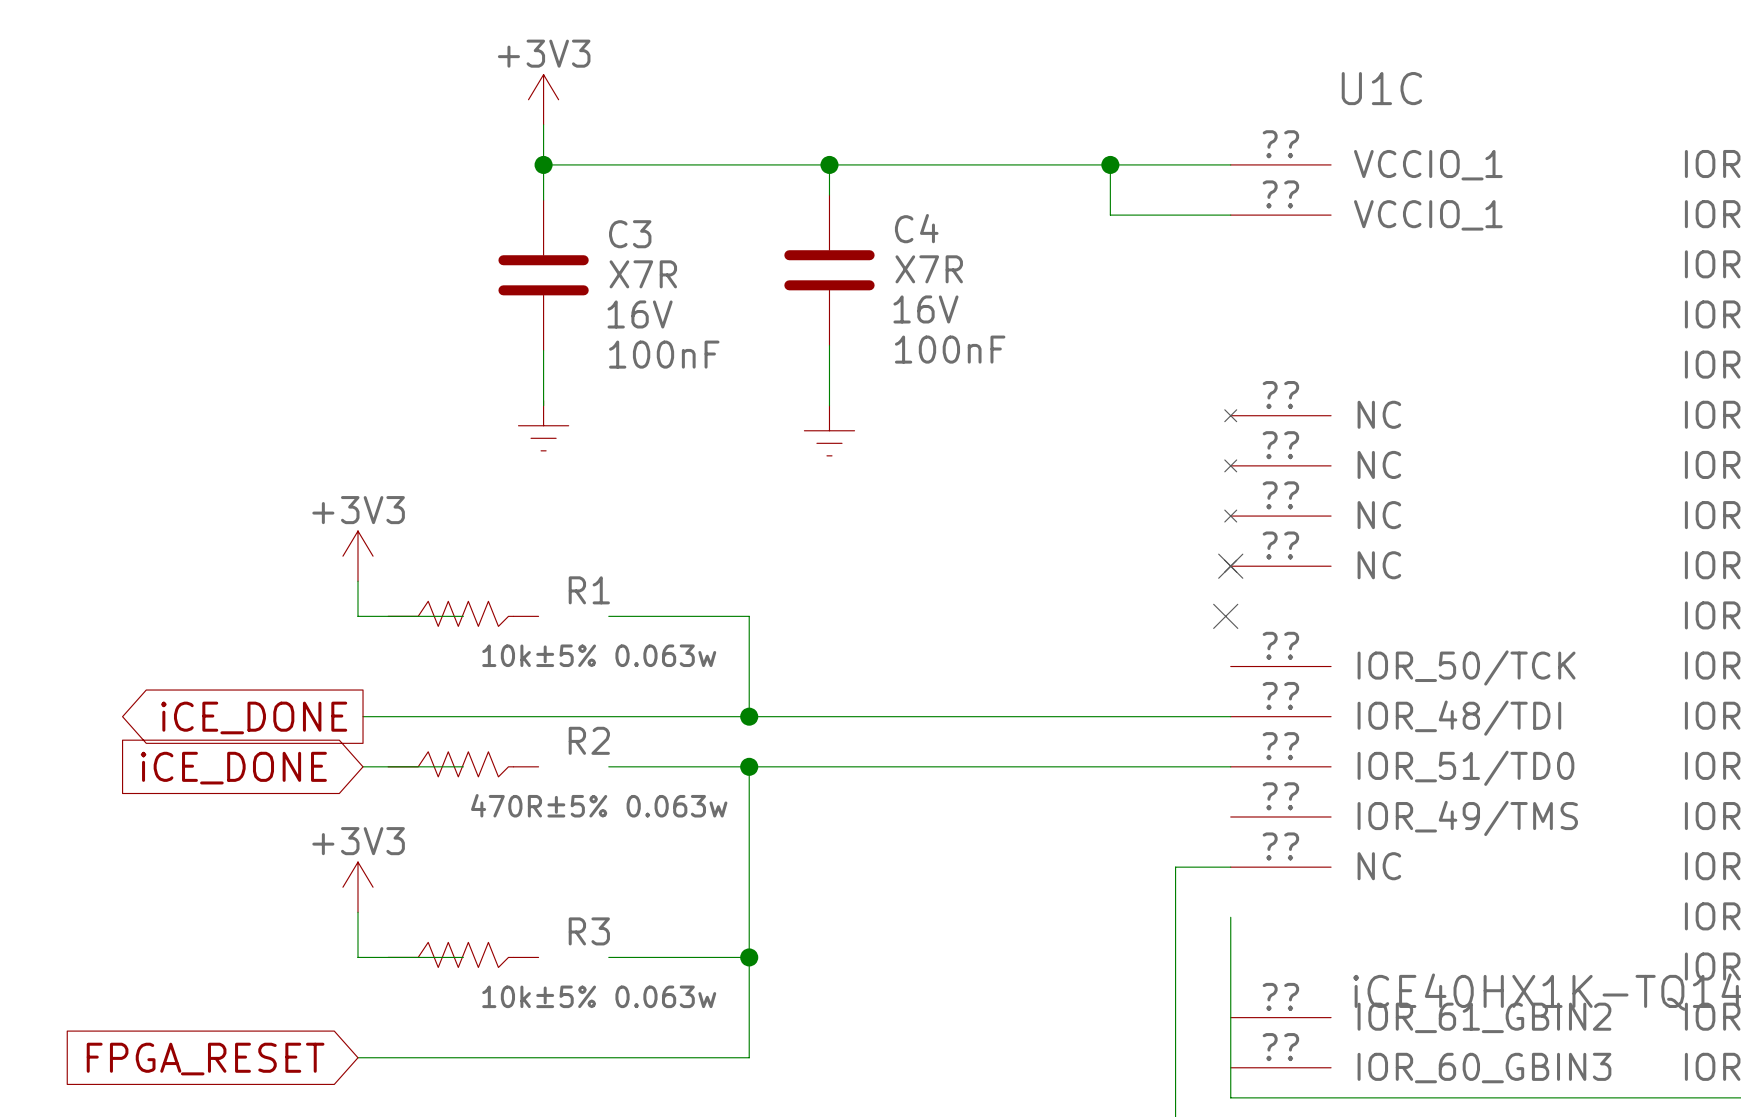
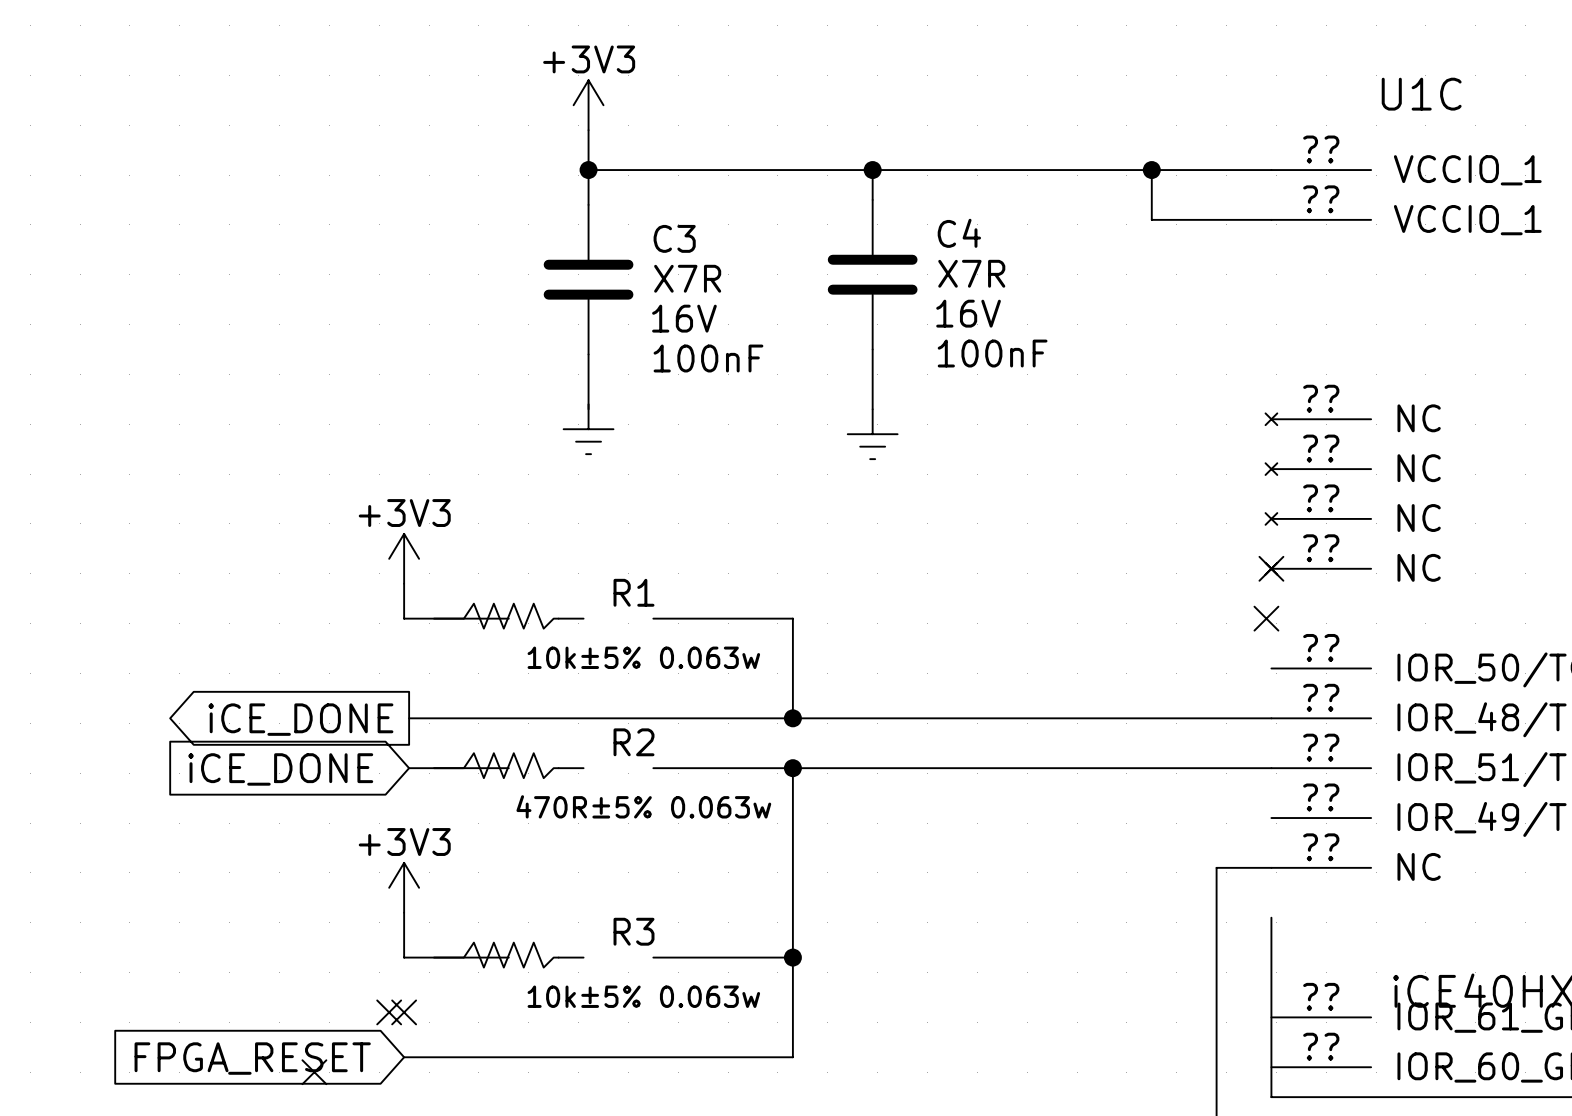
no-connect mark: none -> (389, 1012)
no-connect mark: none -> (404, 1012)
no-connect mark: none -> (314, 1072)

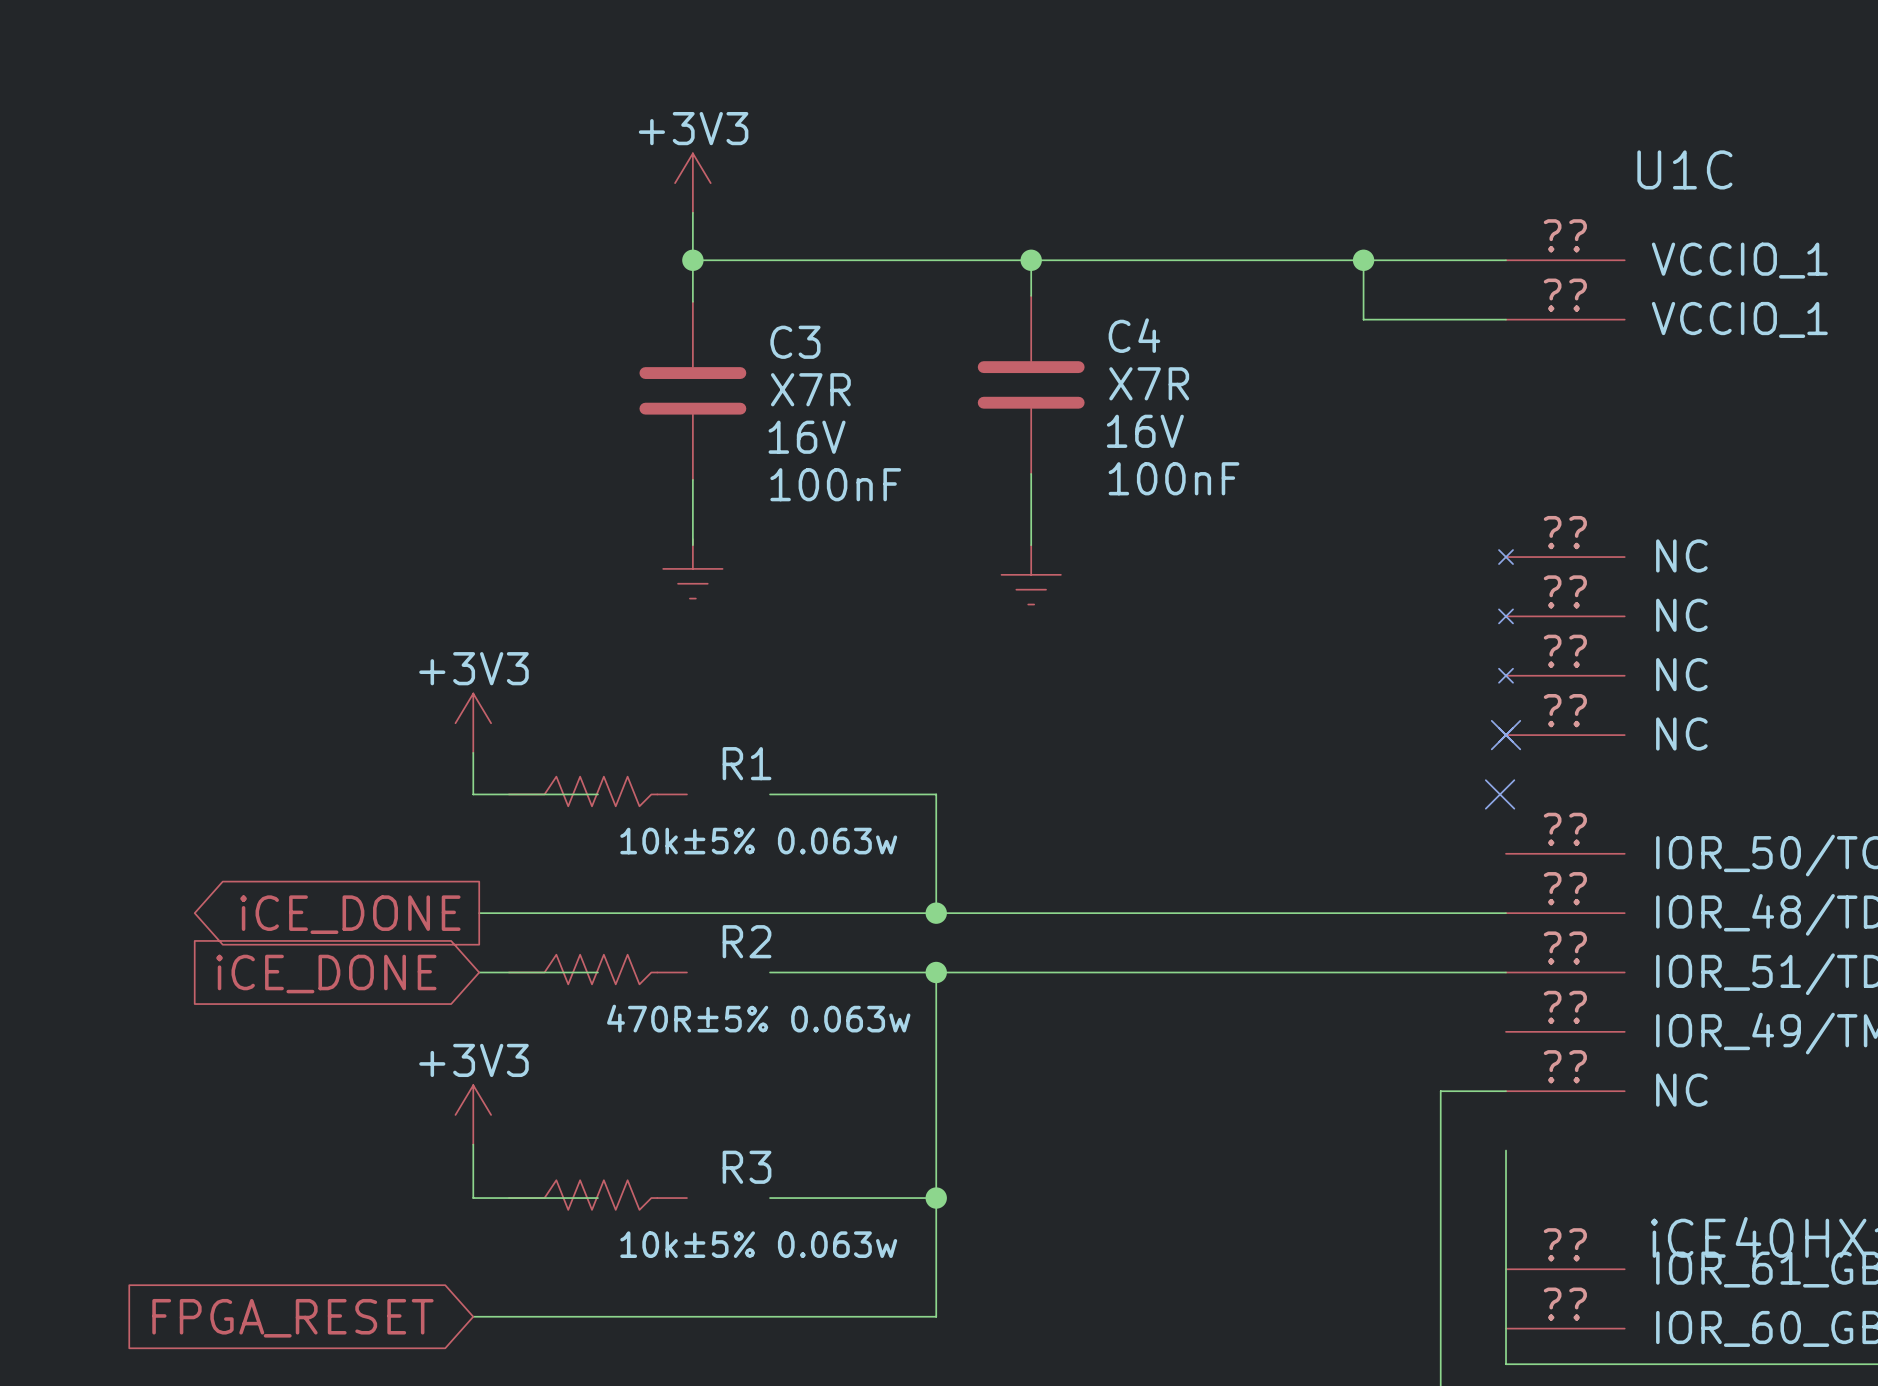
no-connect mark: (389, 1012) -> none
no-connect mark: (404, 1012) -> none
no-connect mark: (314, 1072) -> none

